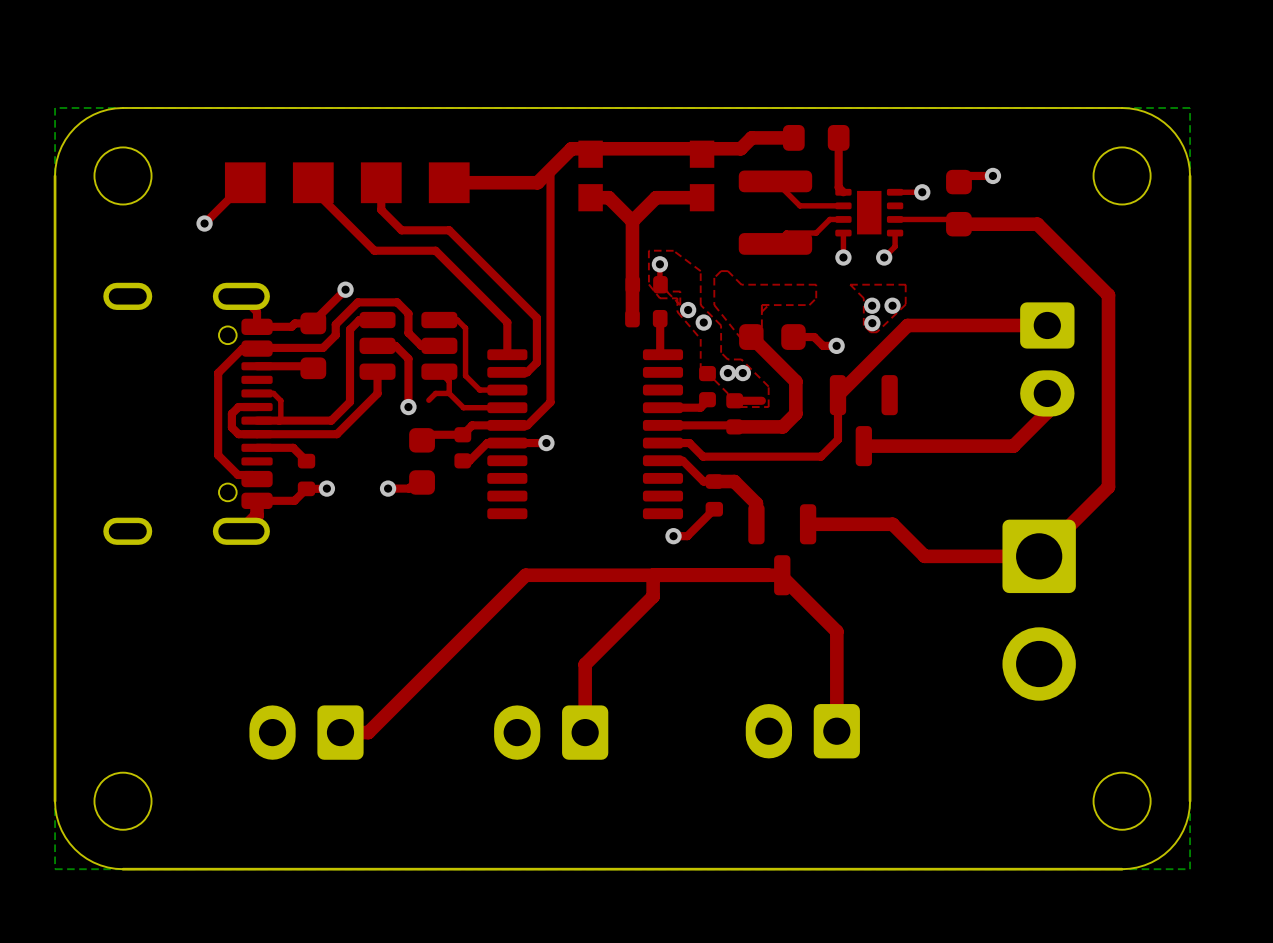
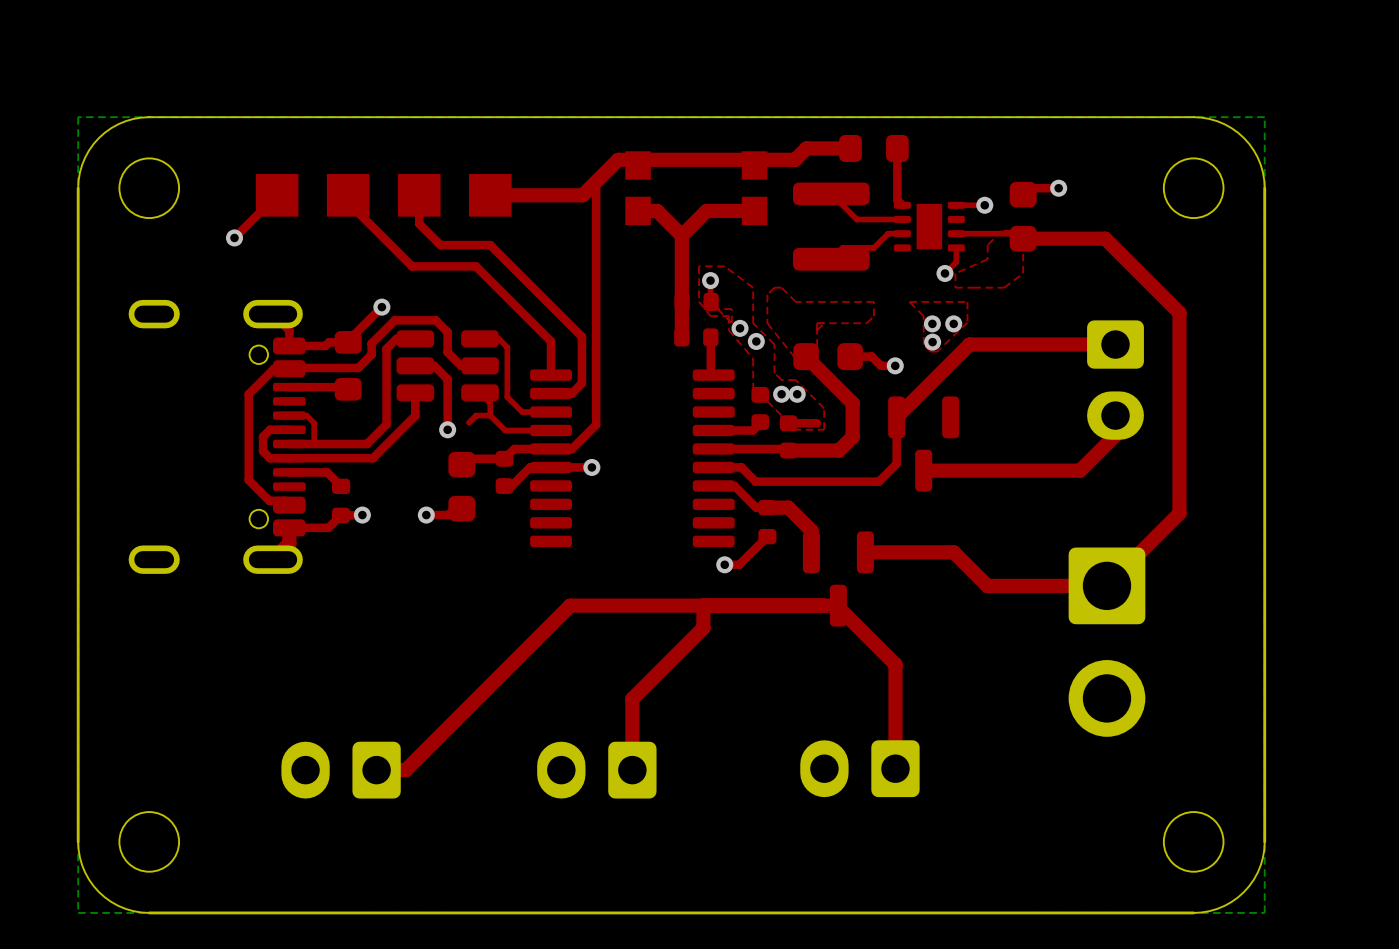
top zone outline: none -> (1023, 230) (1023, 273) (1004, 287) (955, 287) (955, 273) (987, 259) (987, 245) (1001, 230) (1023, 230)
top track: (843, 233) (843, 257) -> none
via: (843, 257) -> none

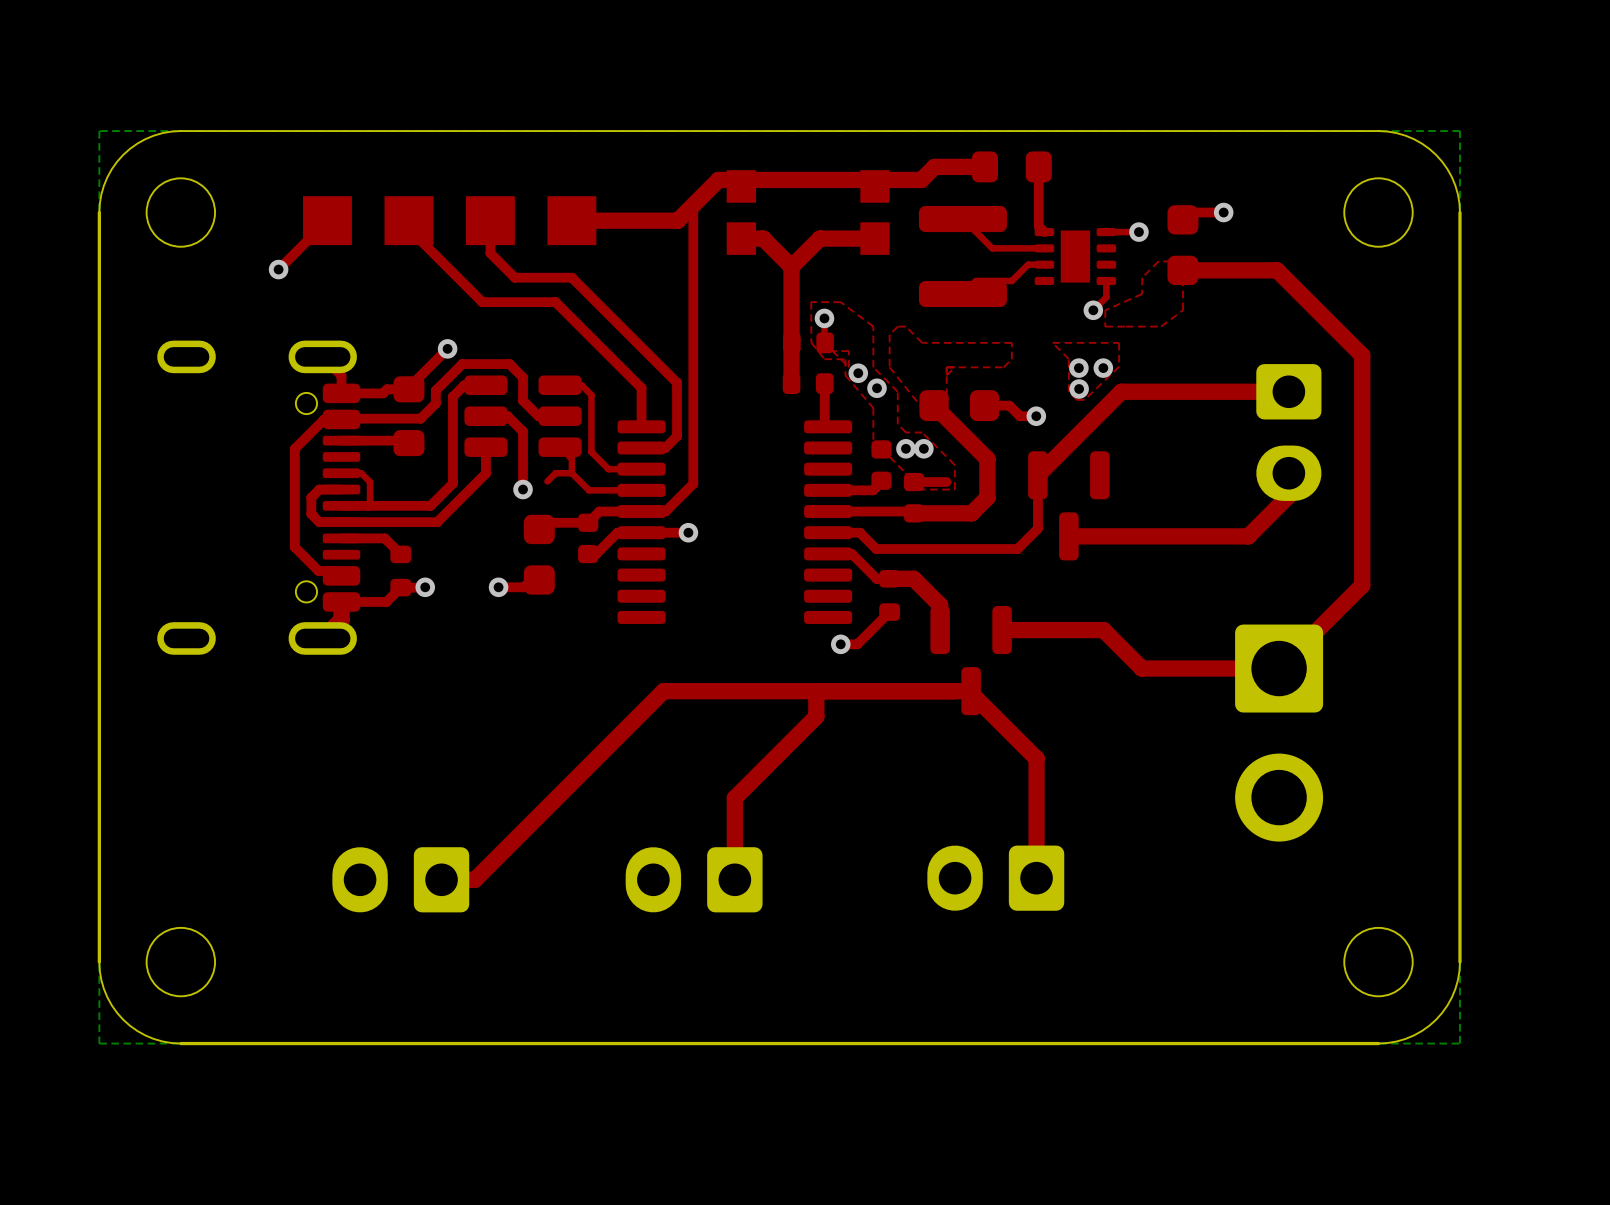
top track: (956, 233) (1018, 233) (1023, 238) -> none

